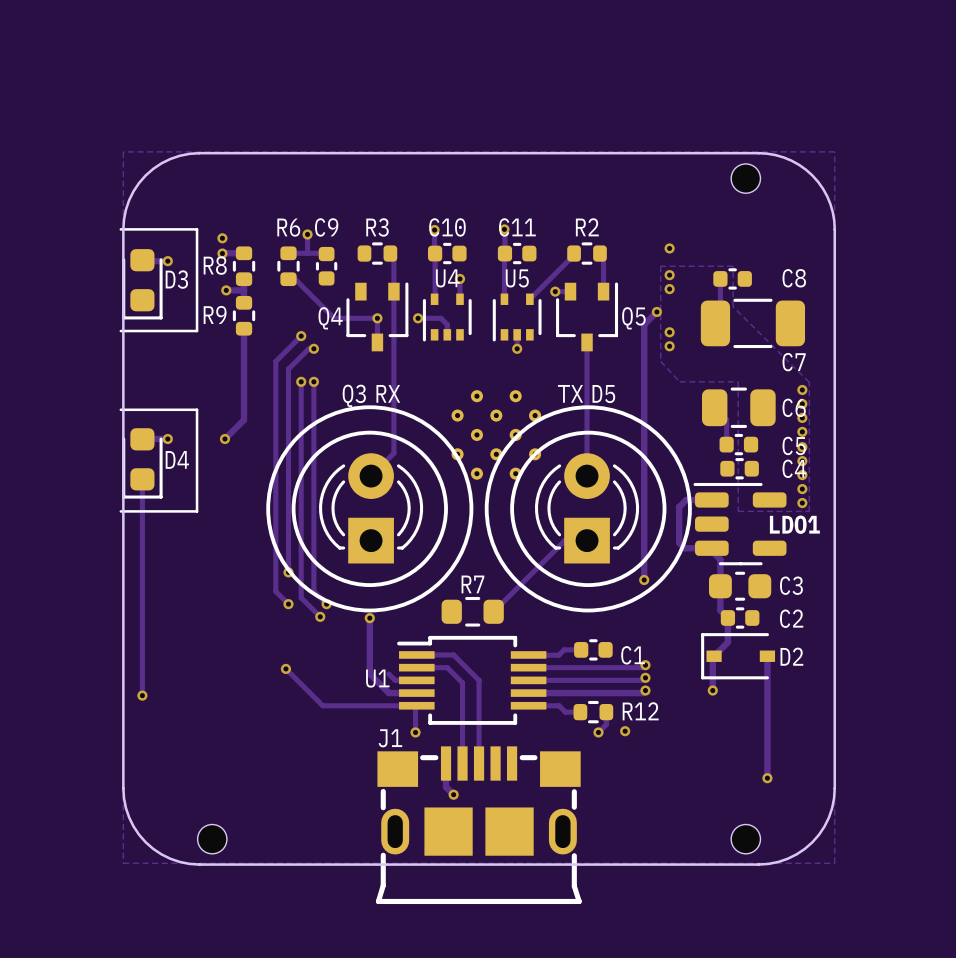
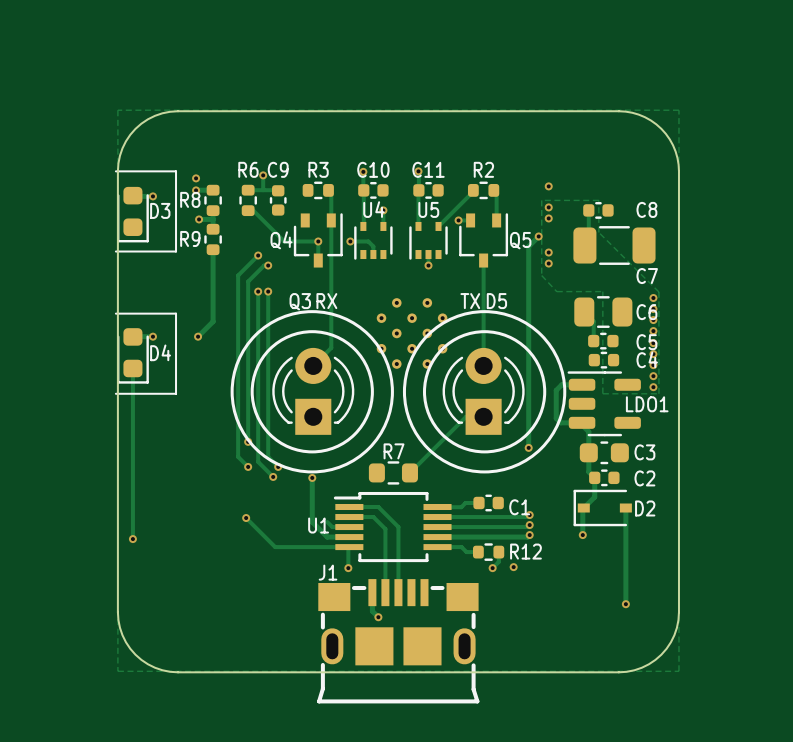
part: (745, 178) -> none
part: (212, 839) -> none
part: (745, 839) -> none

